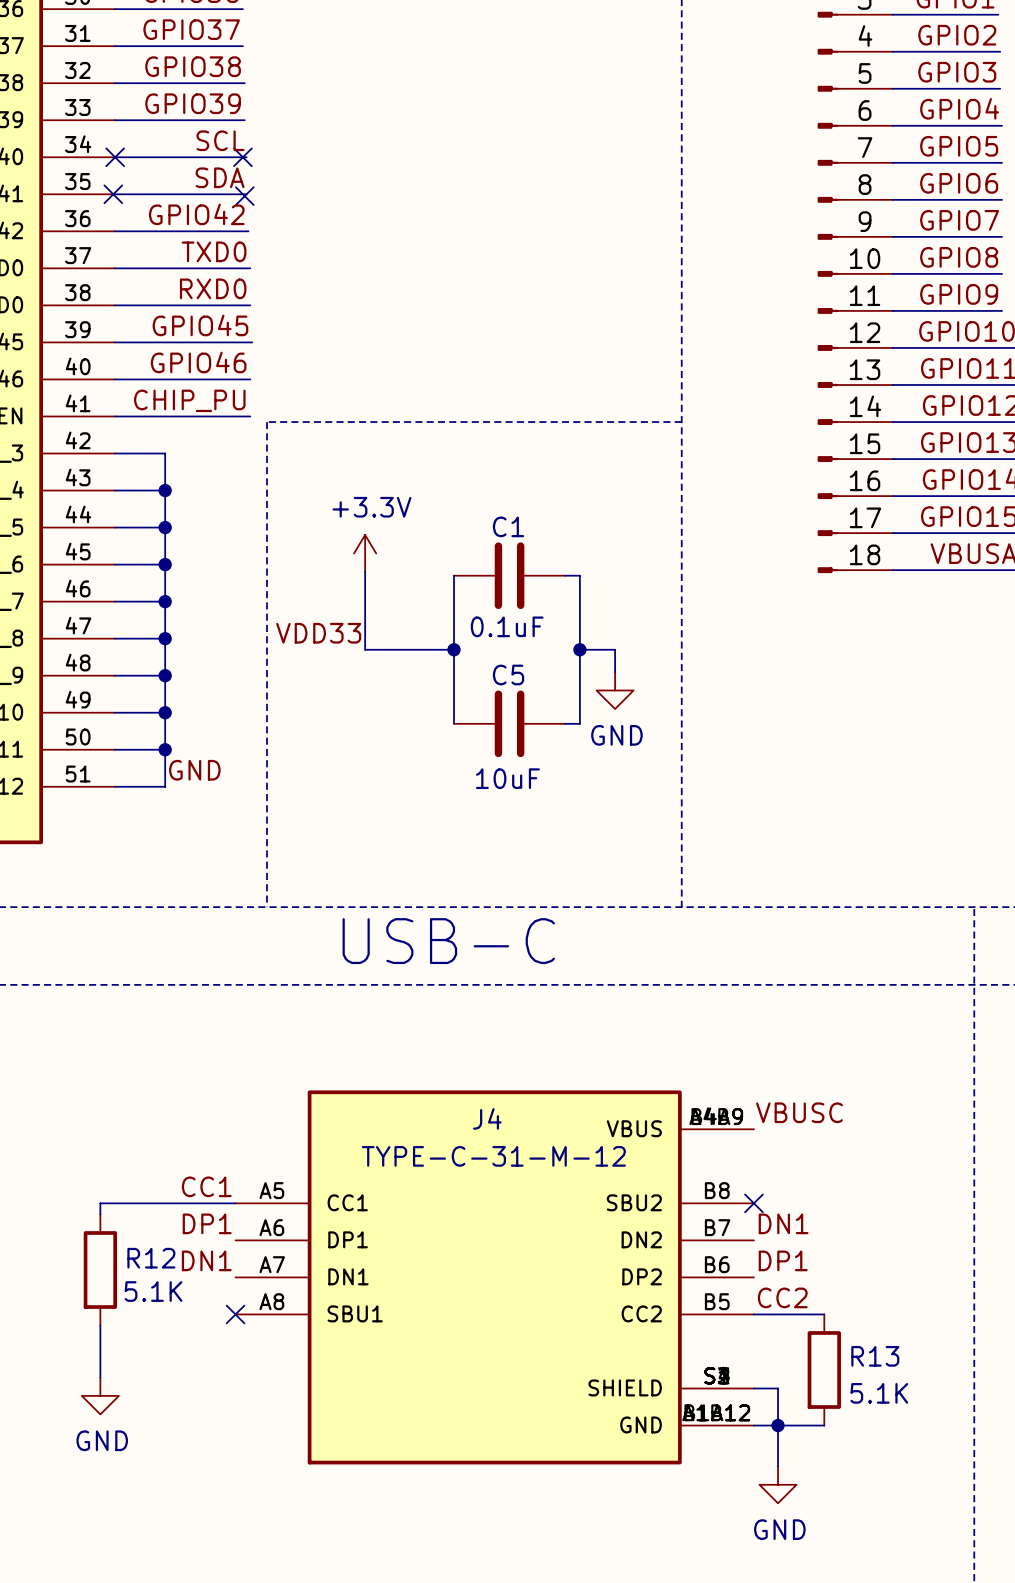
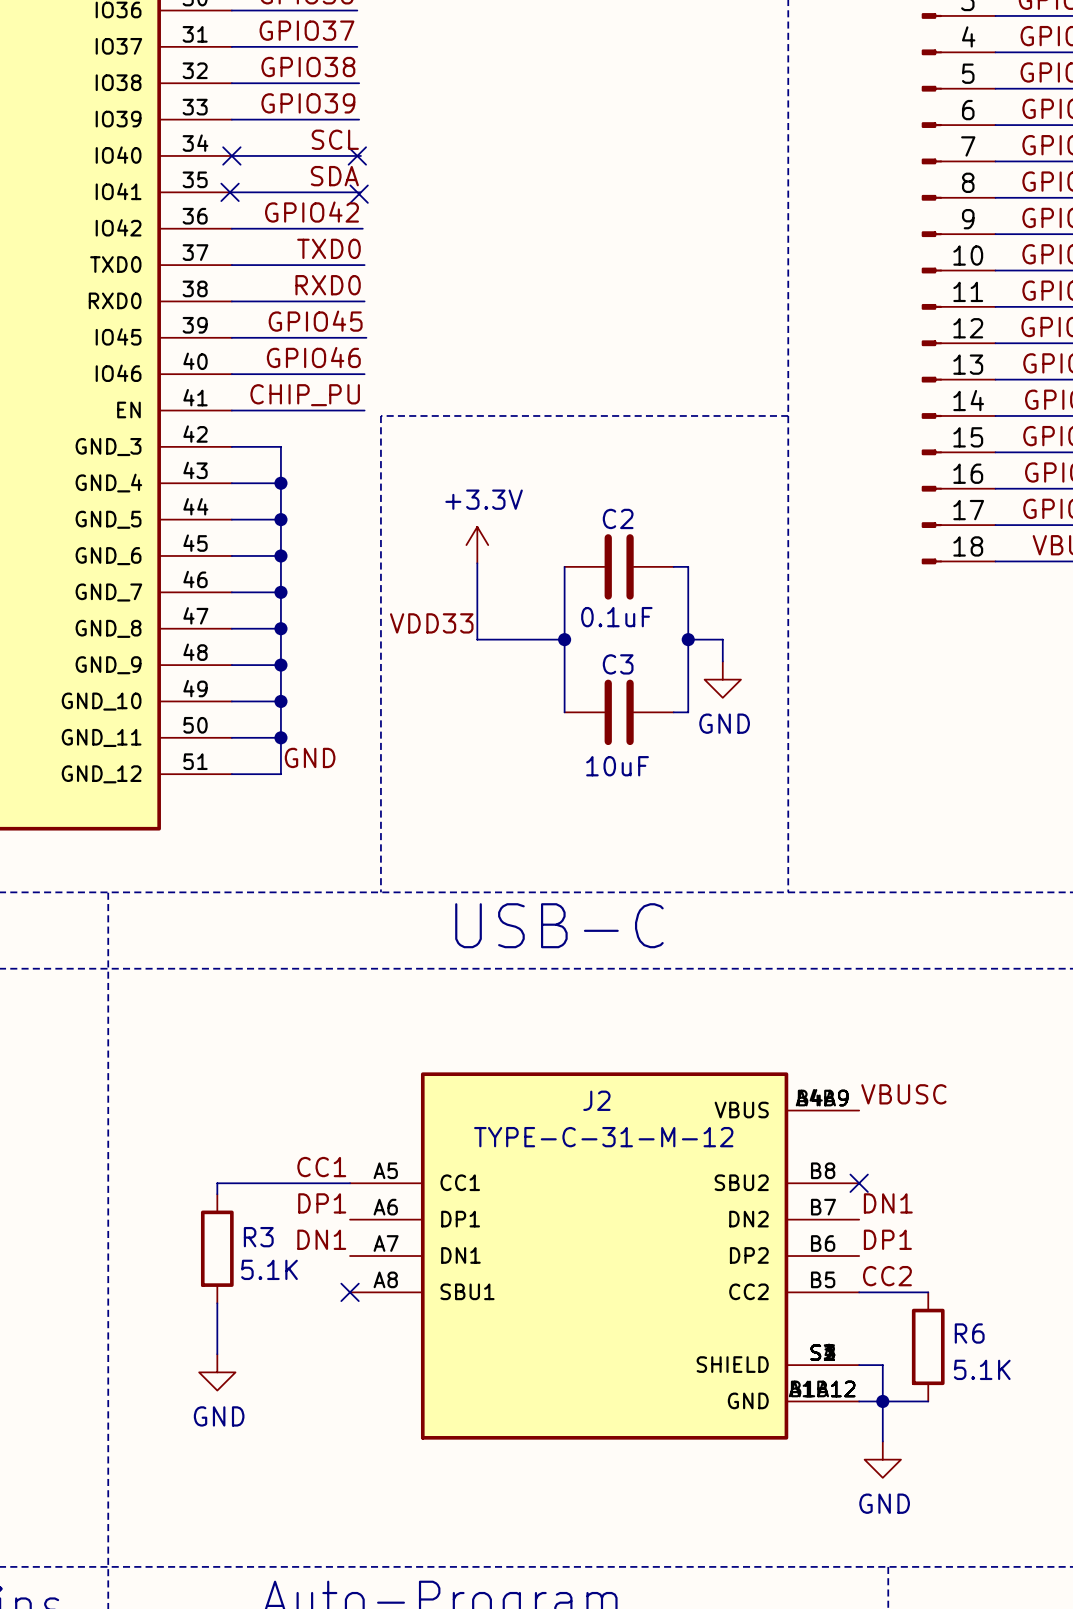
C1 name: C1 (508, 526) -> C2 (618, 518)
C5 name: C5 (508, 674) -> C3 (618, 664)
J4 name: J4 (487, 1118) -> J2 (596, 1100)
R12 name: R12 (151, 1258) -> R3 (258, 1237)
R13 name: R13 (875, 1356) -> R6 (969, 1333)

